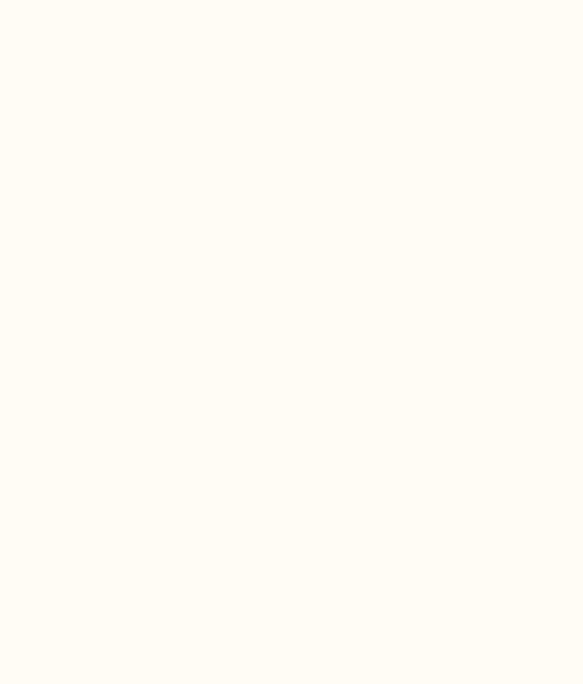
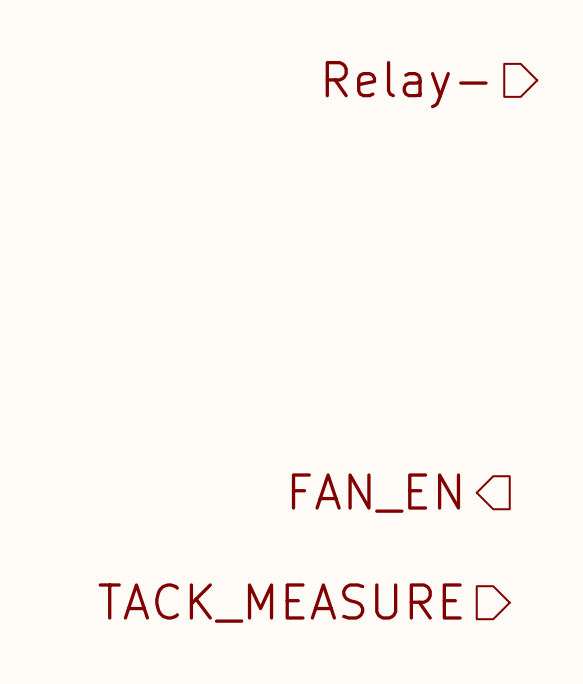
hierarchical label: none -> Relay- (406, 84)
hierarchical label: none -> FAN_EN (376, 493)
hierarchical label: none -> TACK_MEASURE (280, 603)

